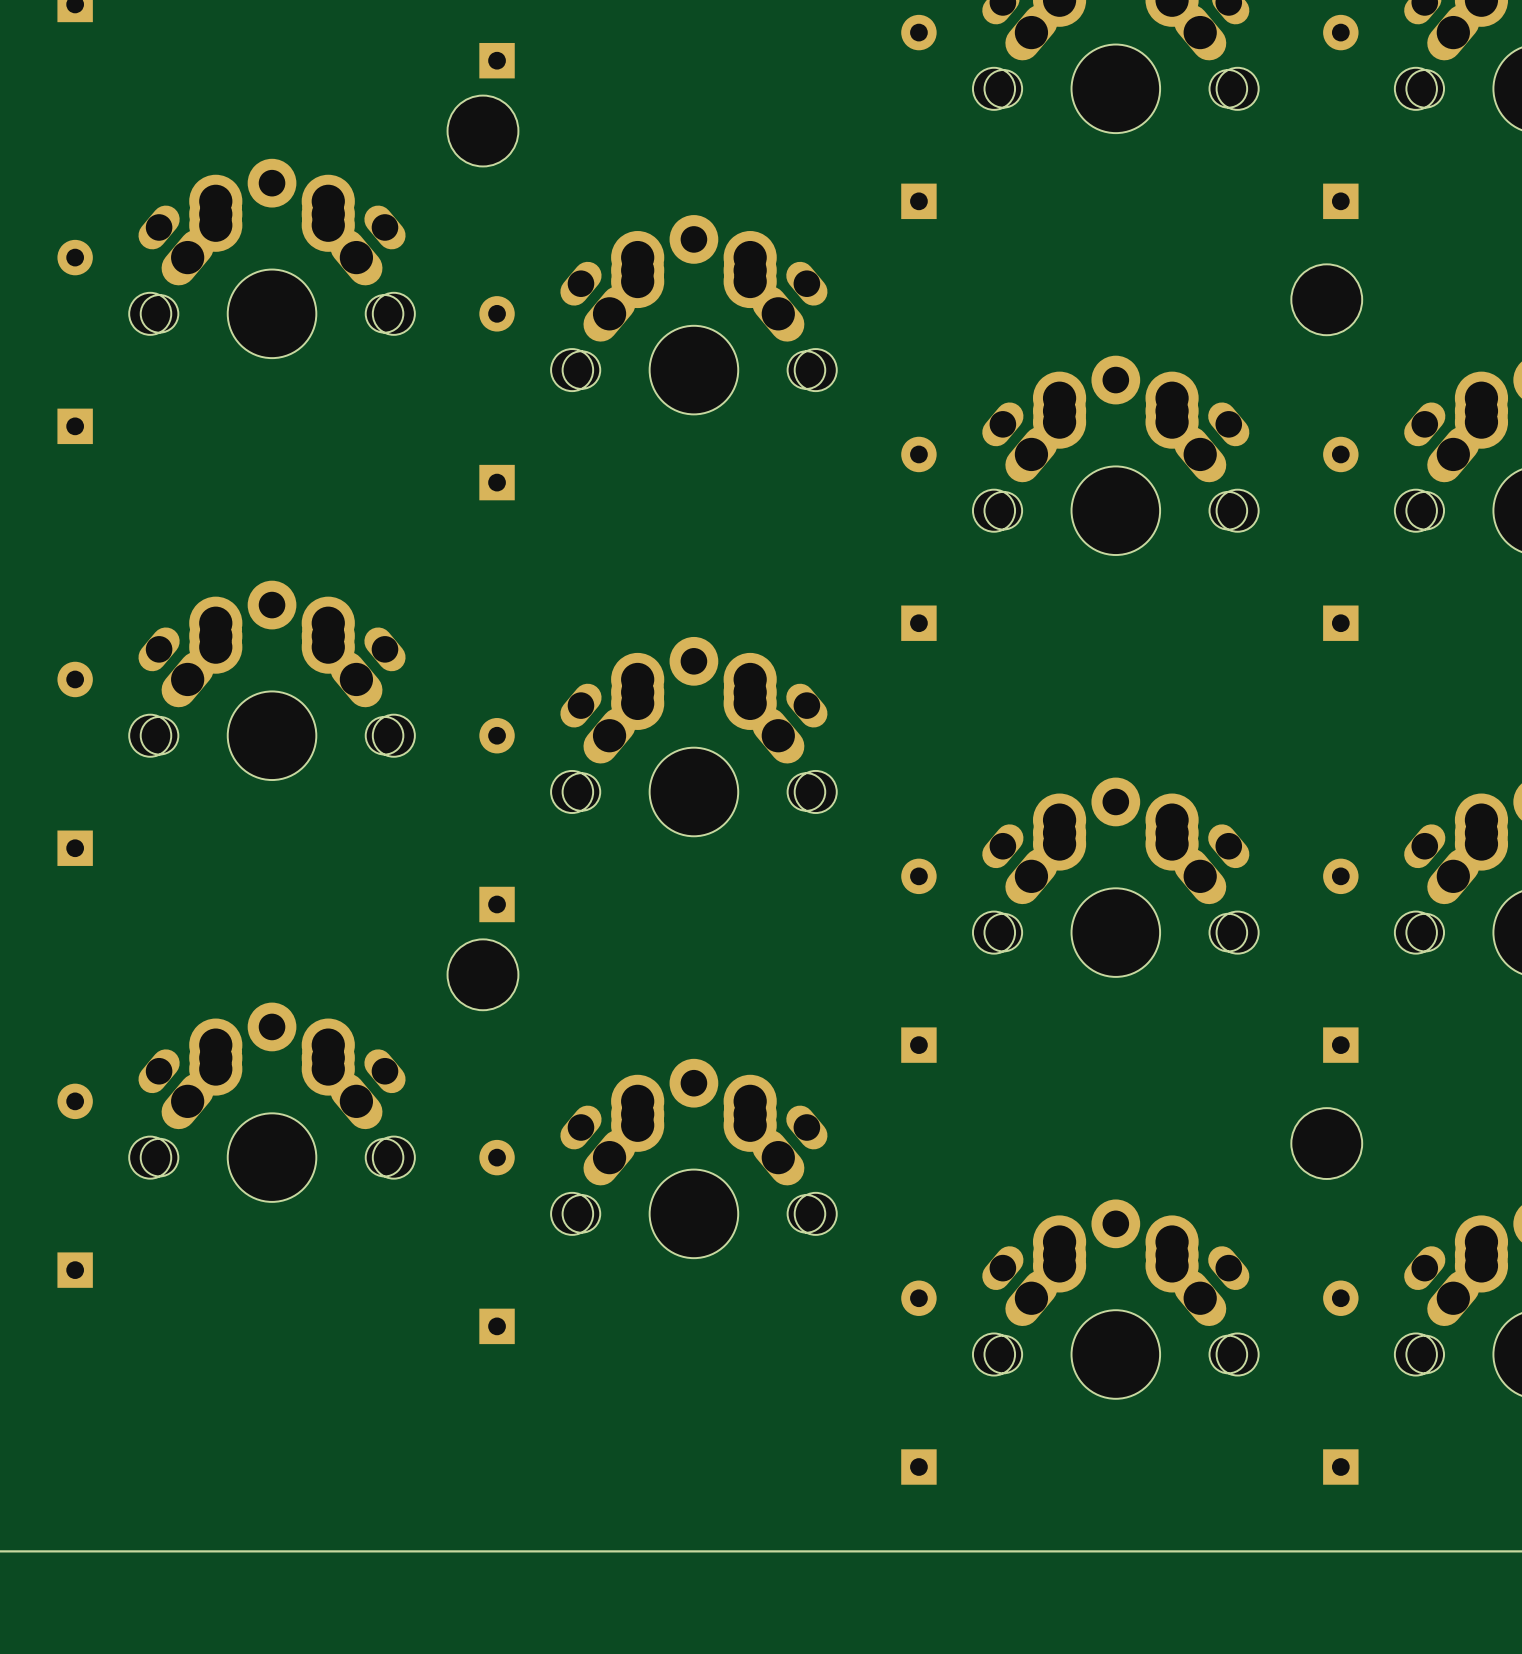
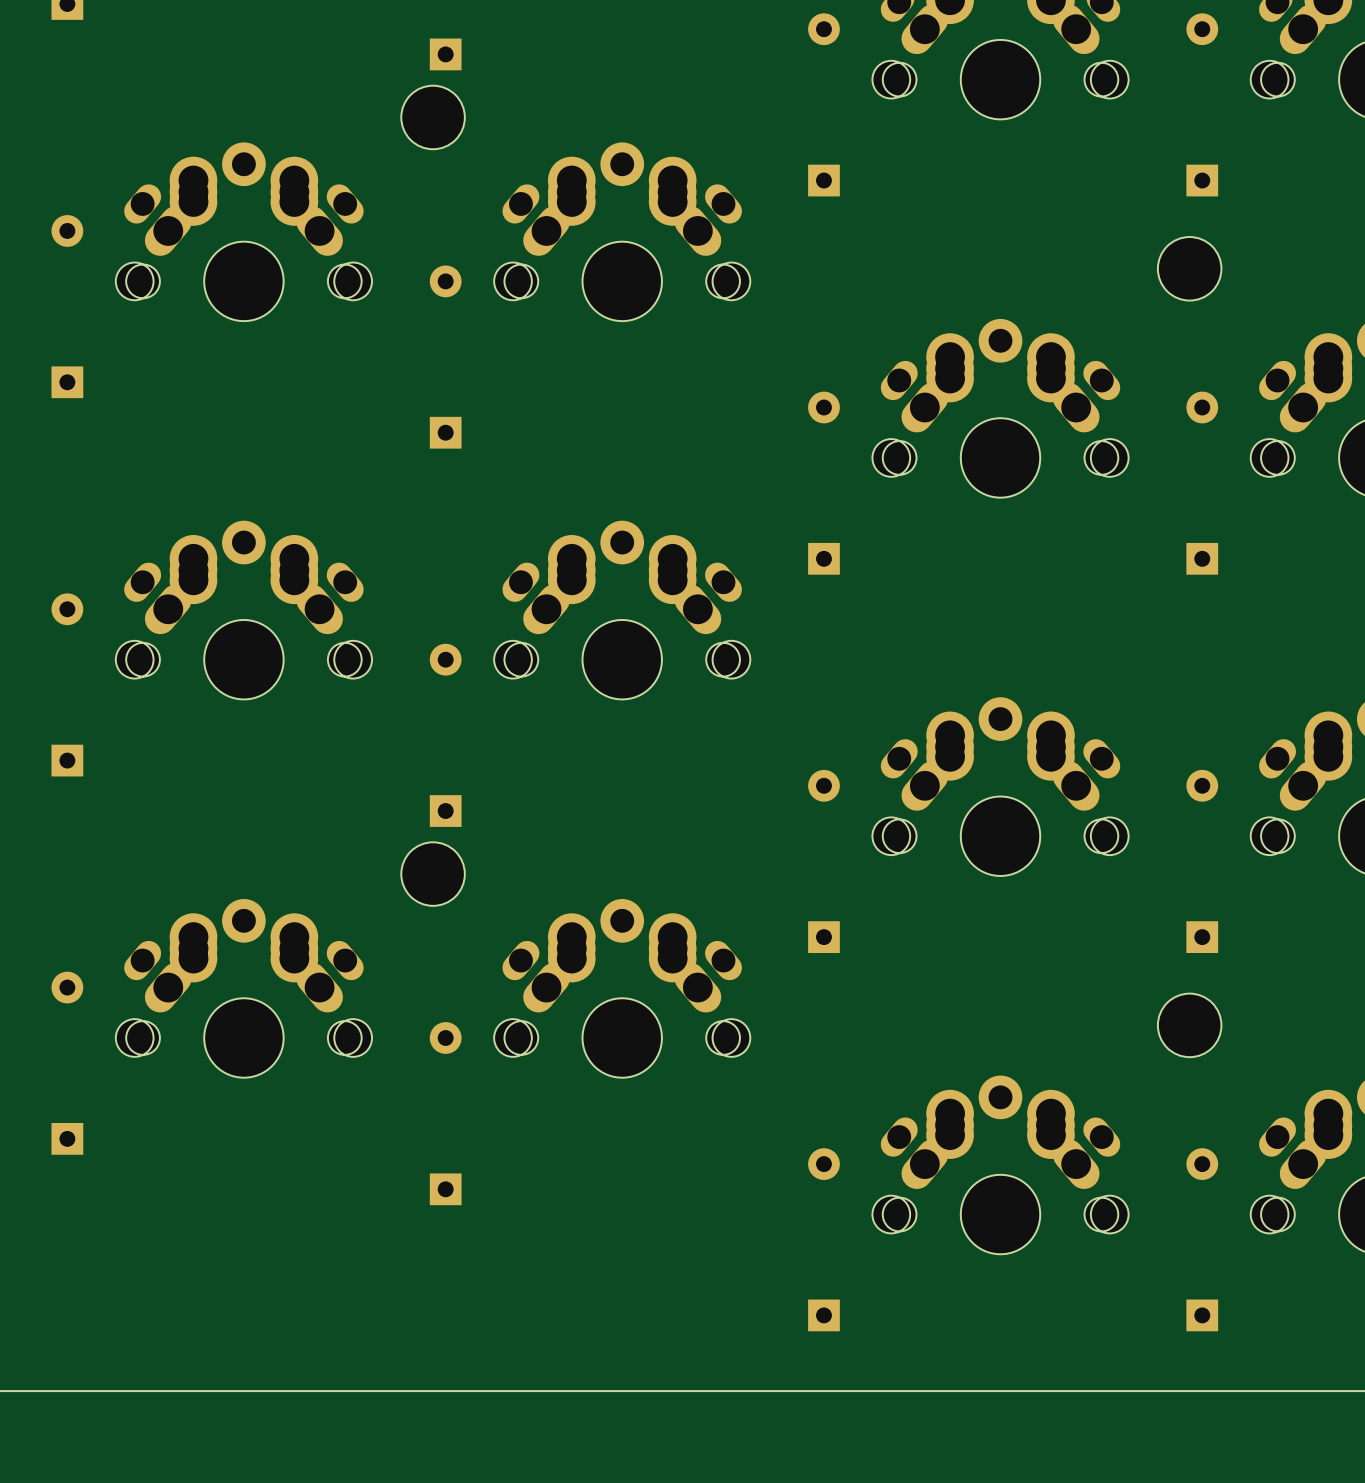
part position: (693, 314) -> (622, 231)
part position: (693, 736) -> (622, 610)
part position: (693, 1158) -> (622, 988)

